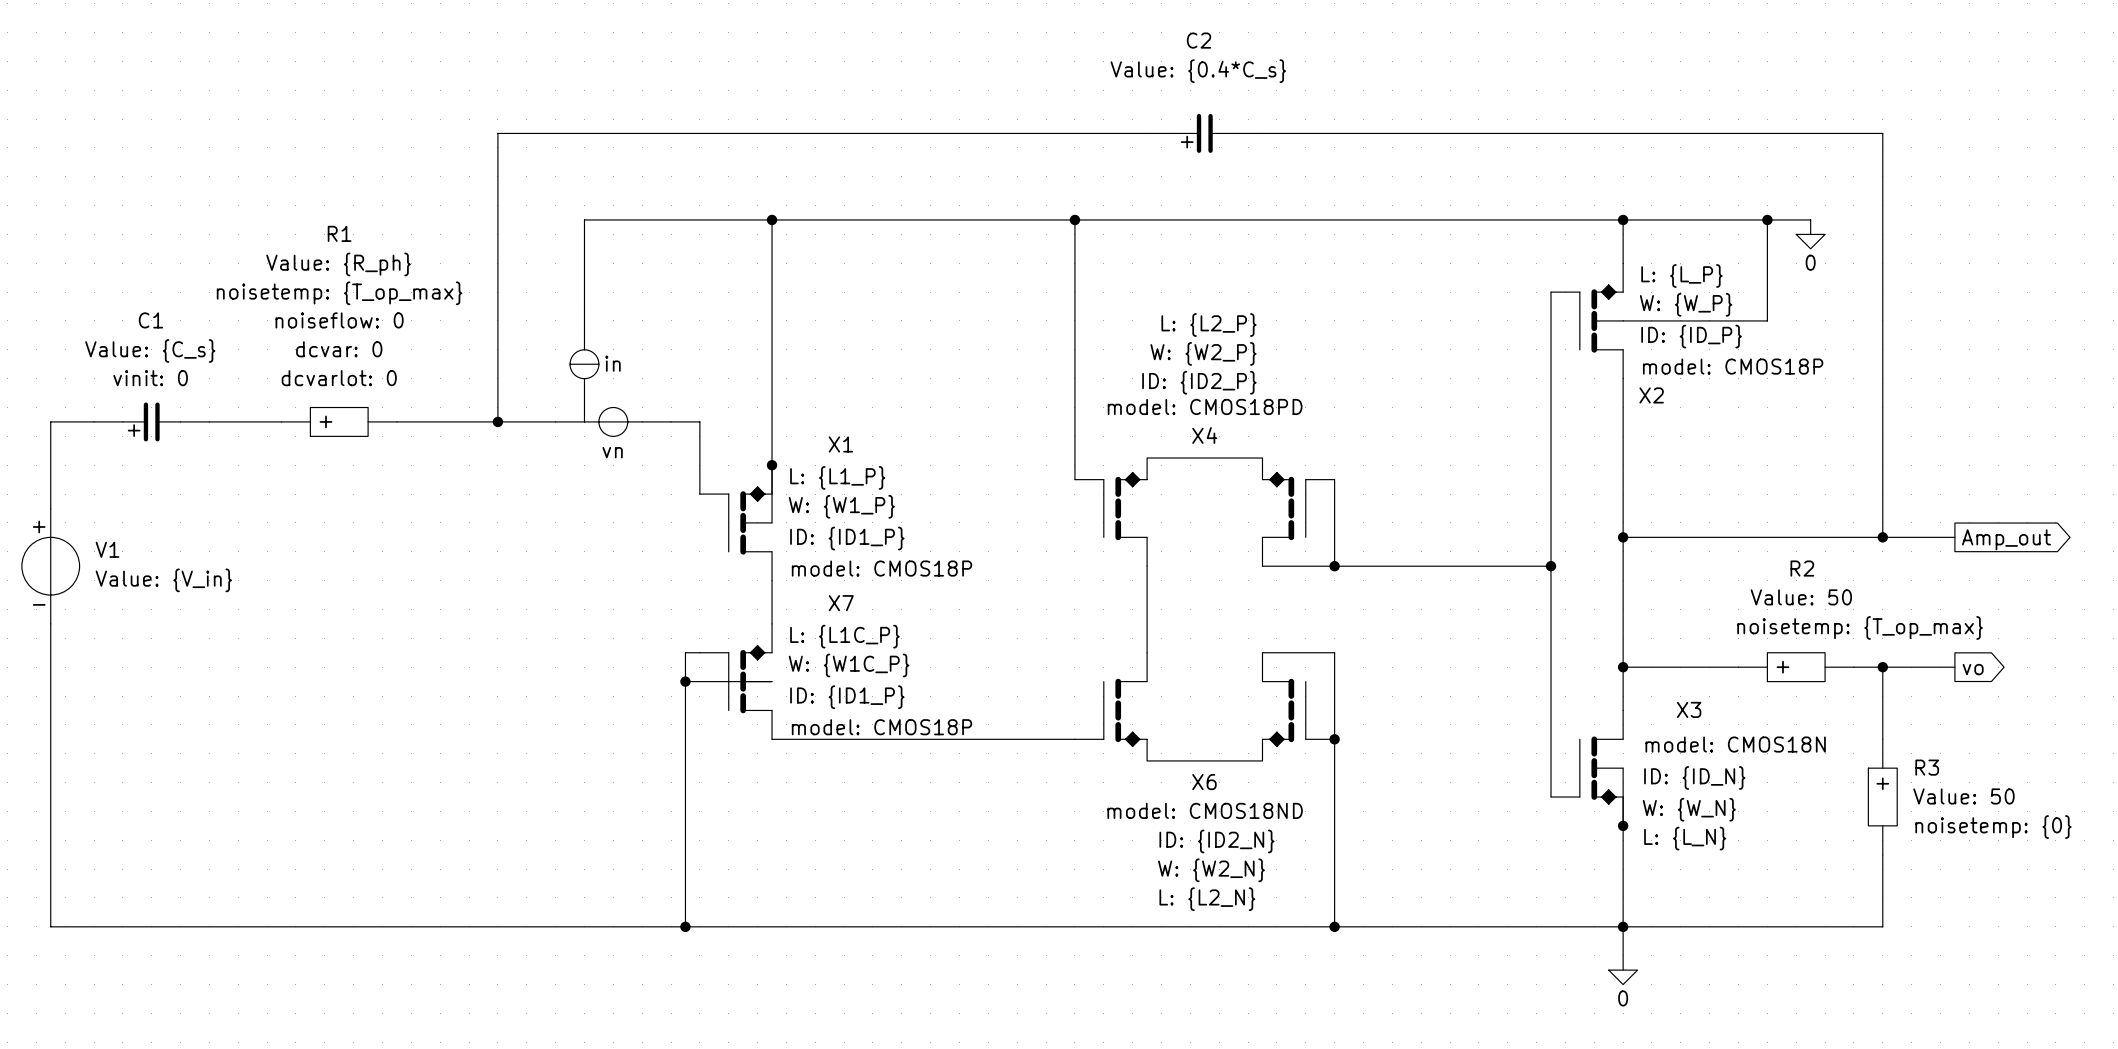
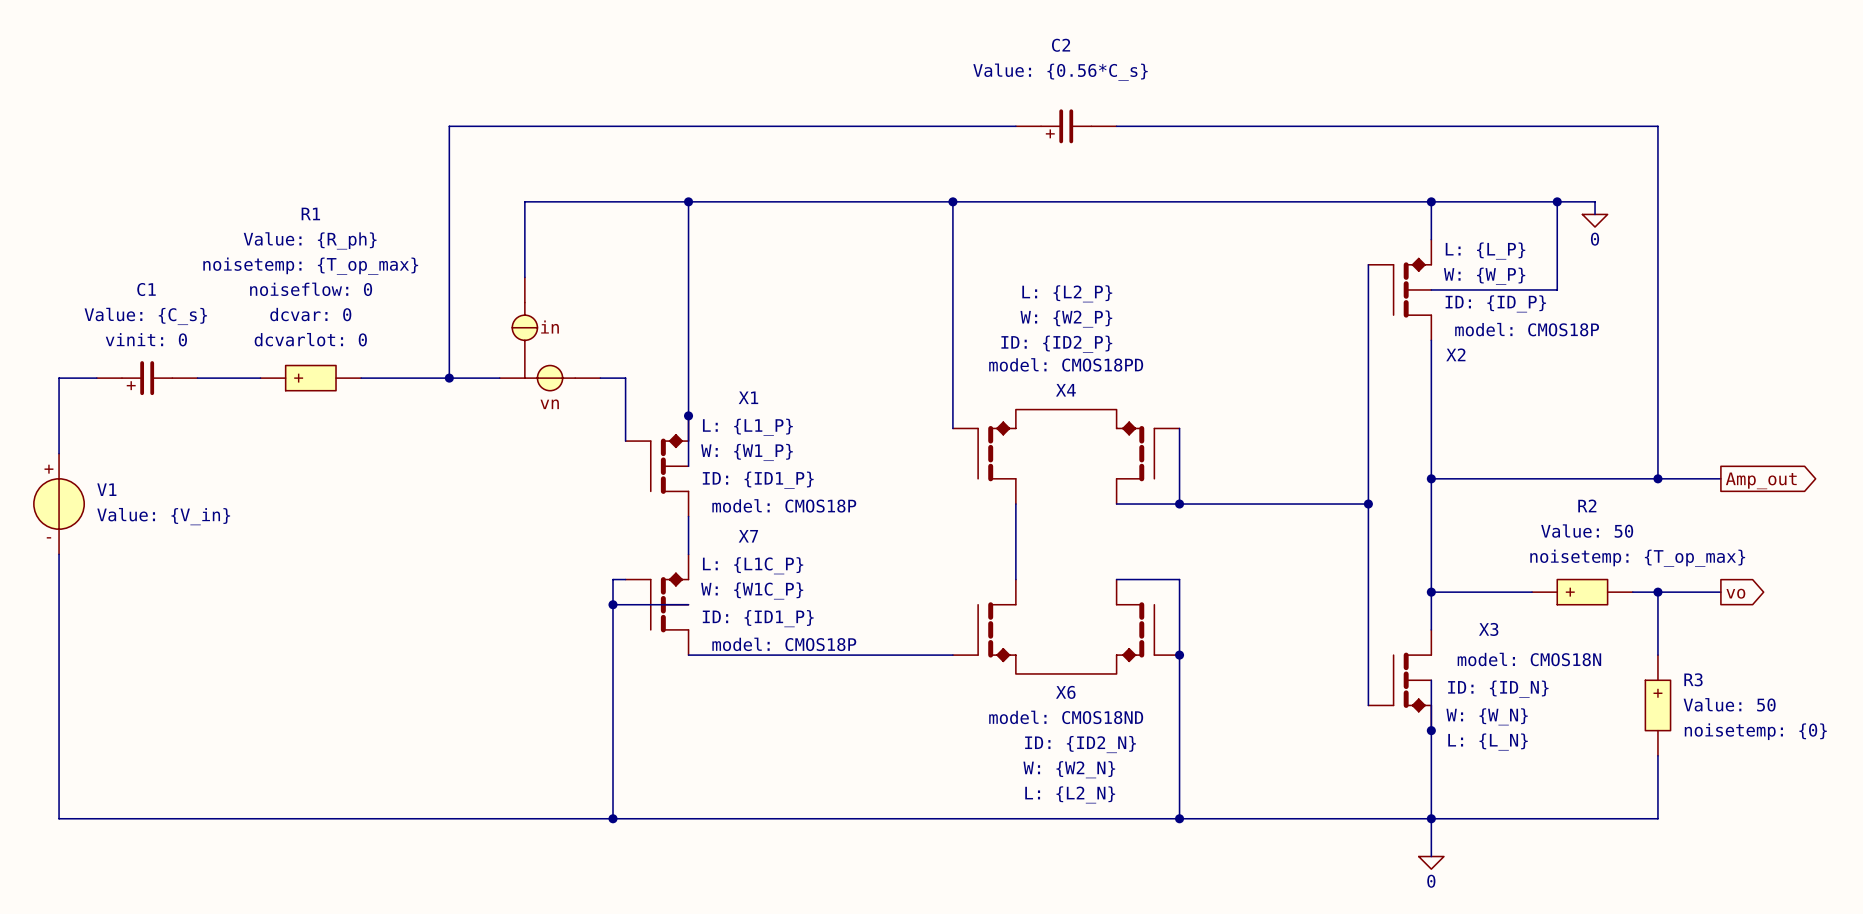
C2 value: Value: {0.4*C_s} (1198, 71) -> Value: {0.56*C_s} (1060, 72)

